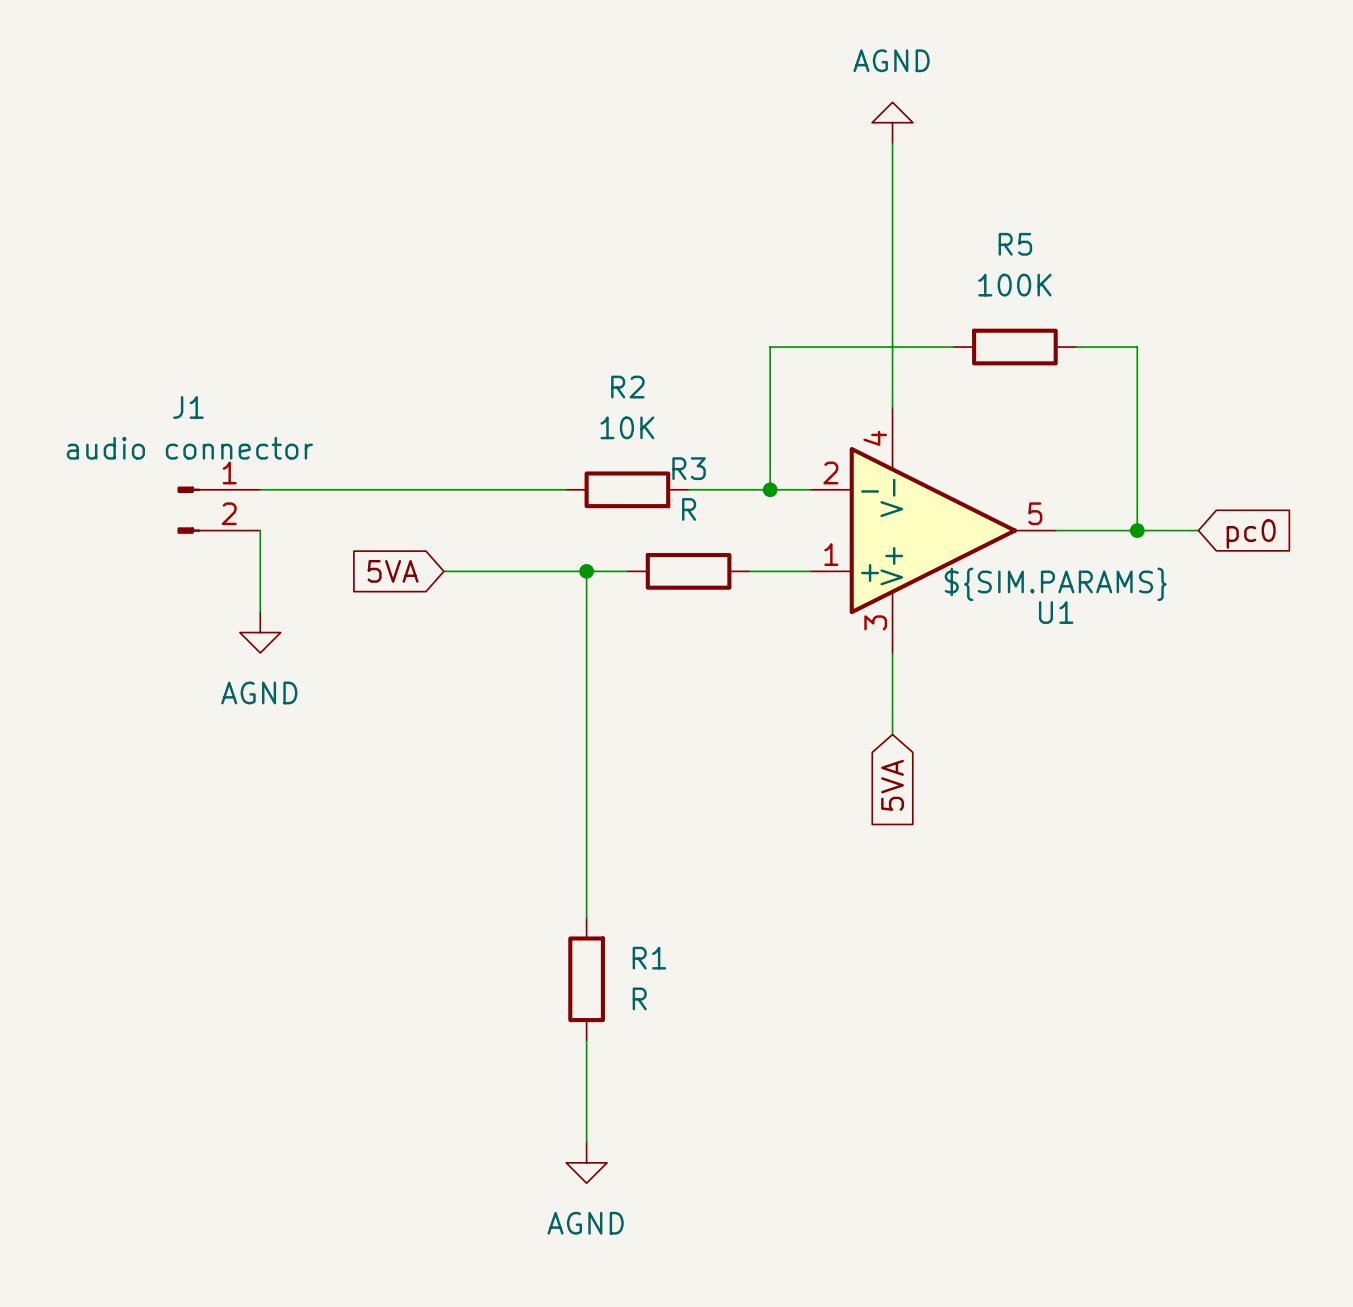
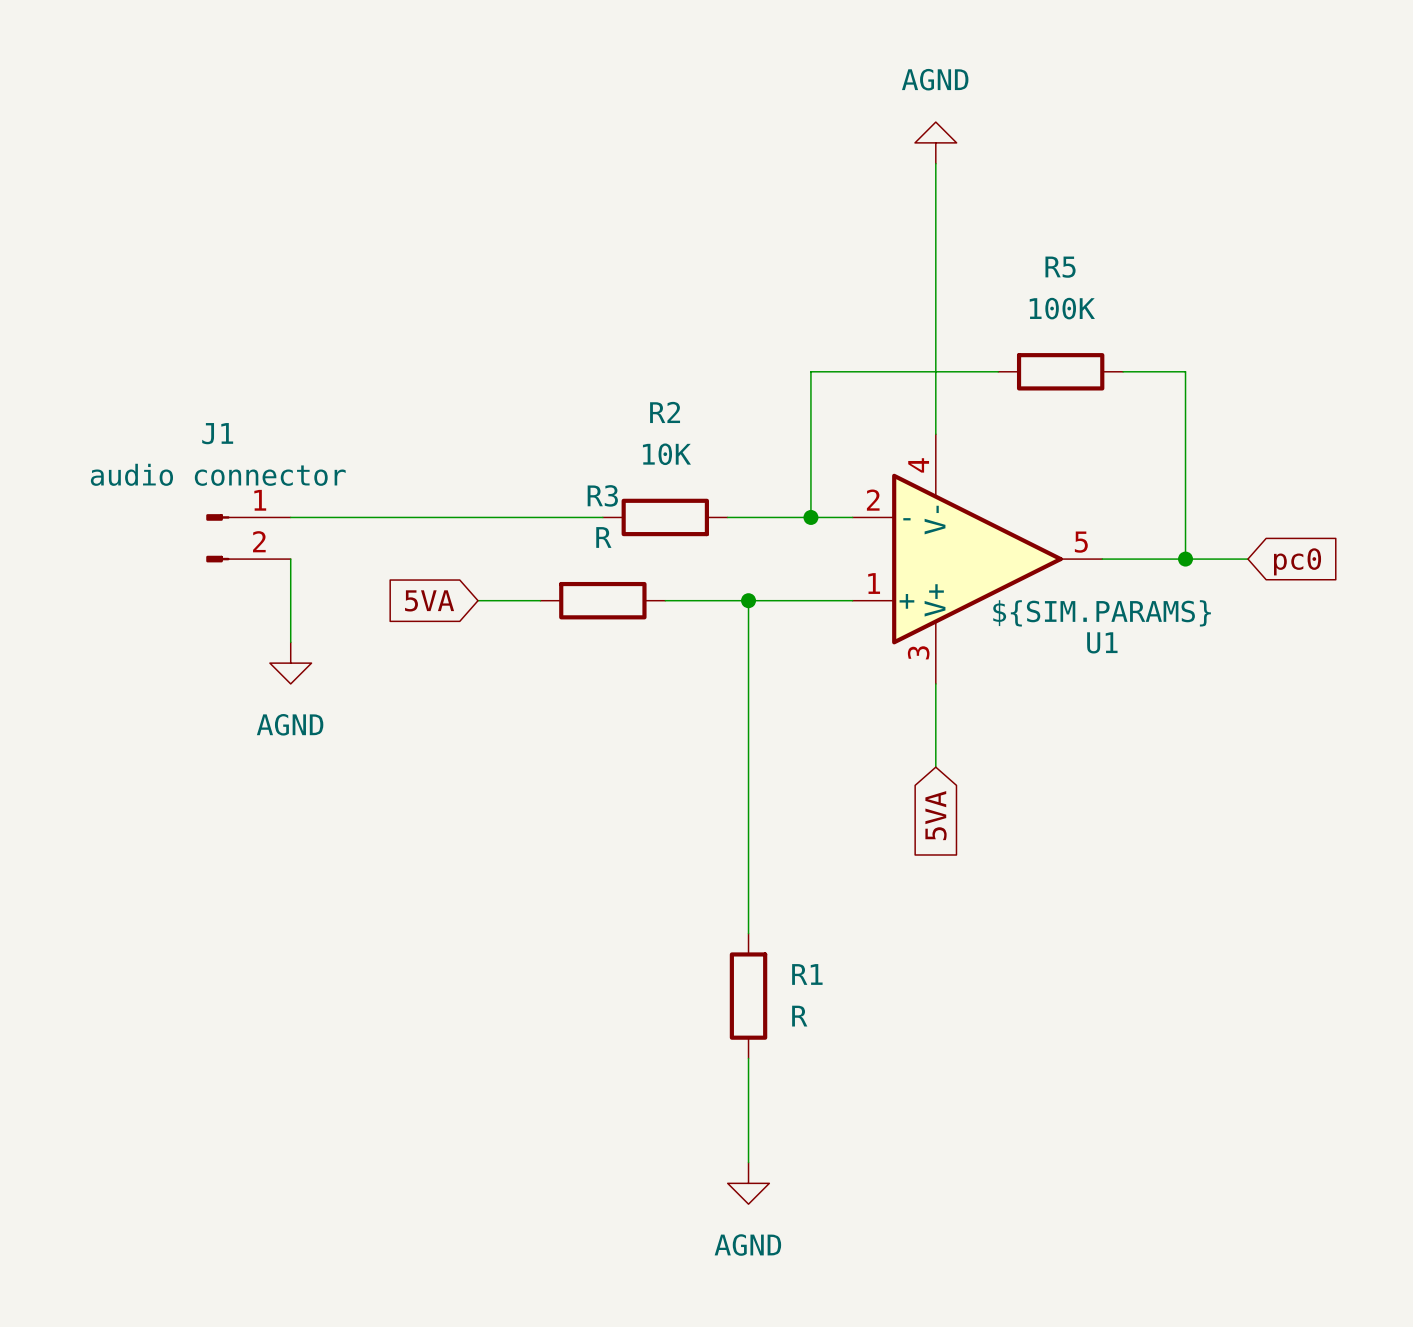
wire: (505, 571) (627, 571) -> (790, 600) (665, 600)
wire: (586, 571) (586, 918) -> none
junction: (586, 571) -> none
R3 position: (688, 571) -> (602, 600)
wire: none -> (748, 600) (748, 933)
junction: none -> (748, 600)
R1 position: (586, 979) -> (748, 996)
wire: (586, 1040) (586, 1142) -> (748, 1058) (748, 1162)
power symbol position: AGND (586, 1162) -> AGND (748, 1183)

